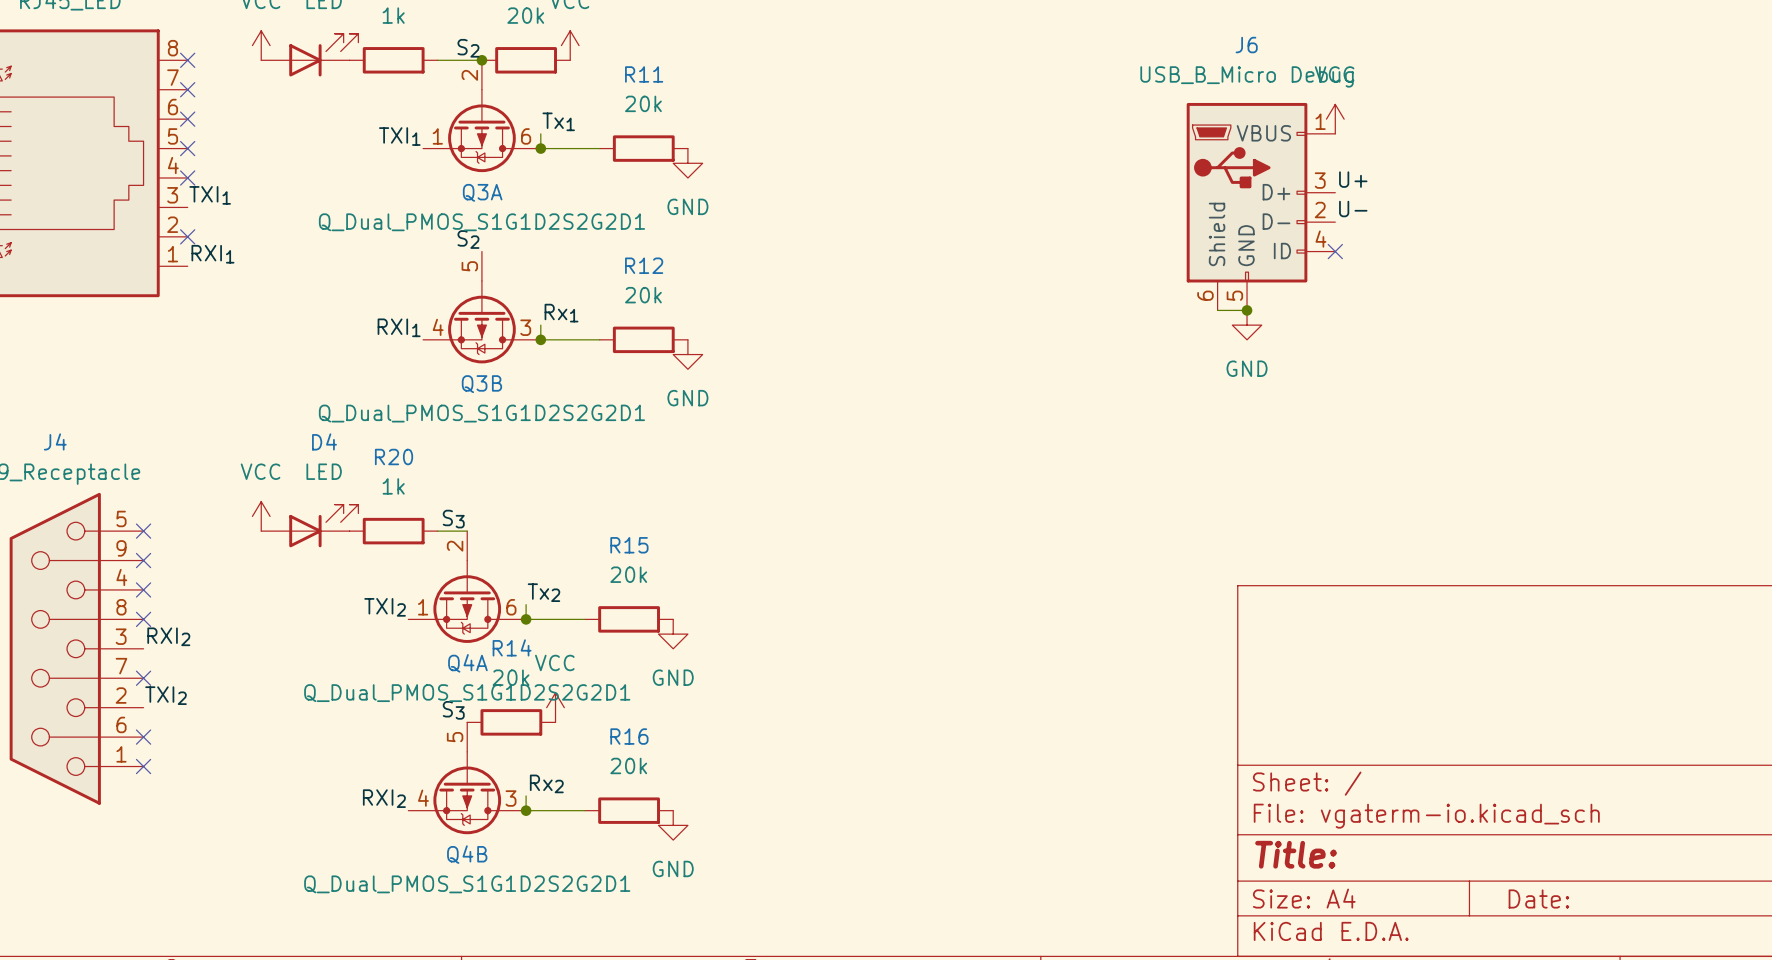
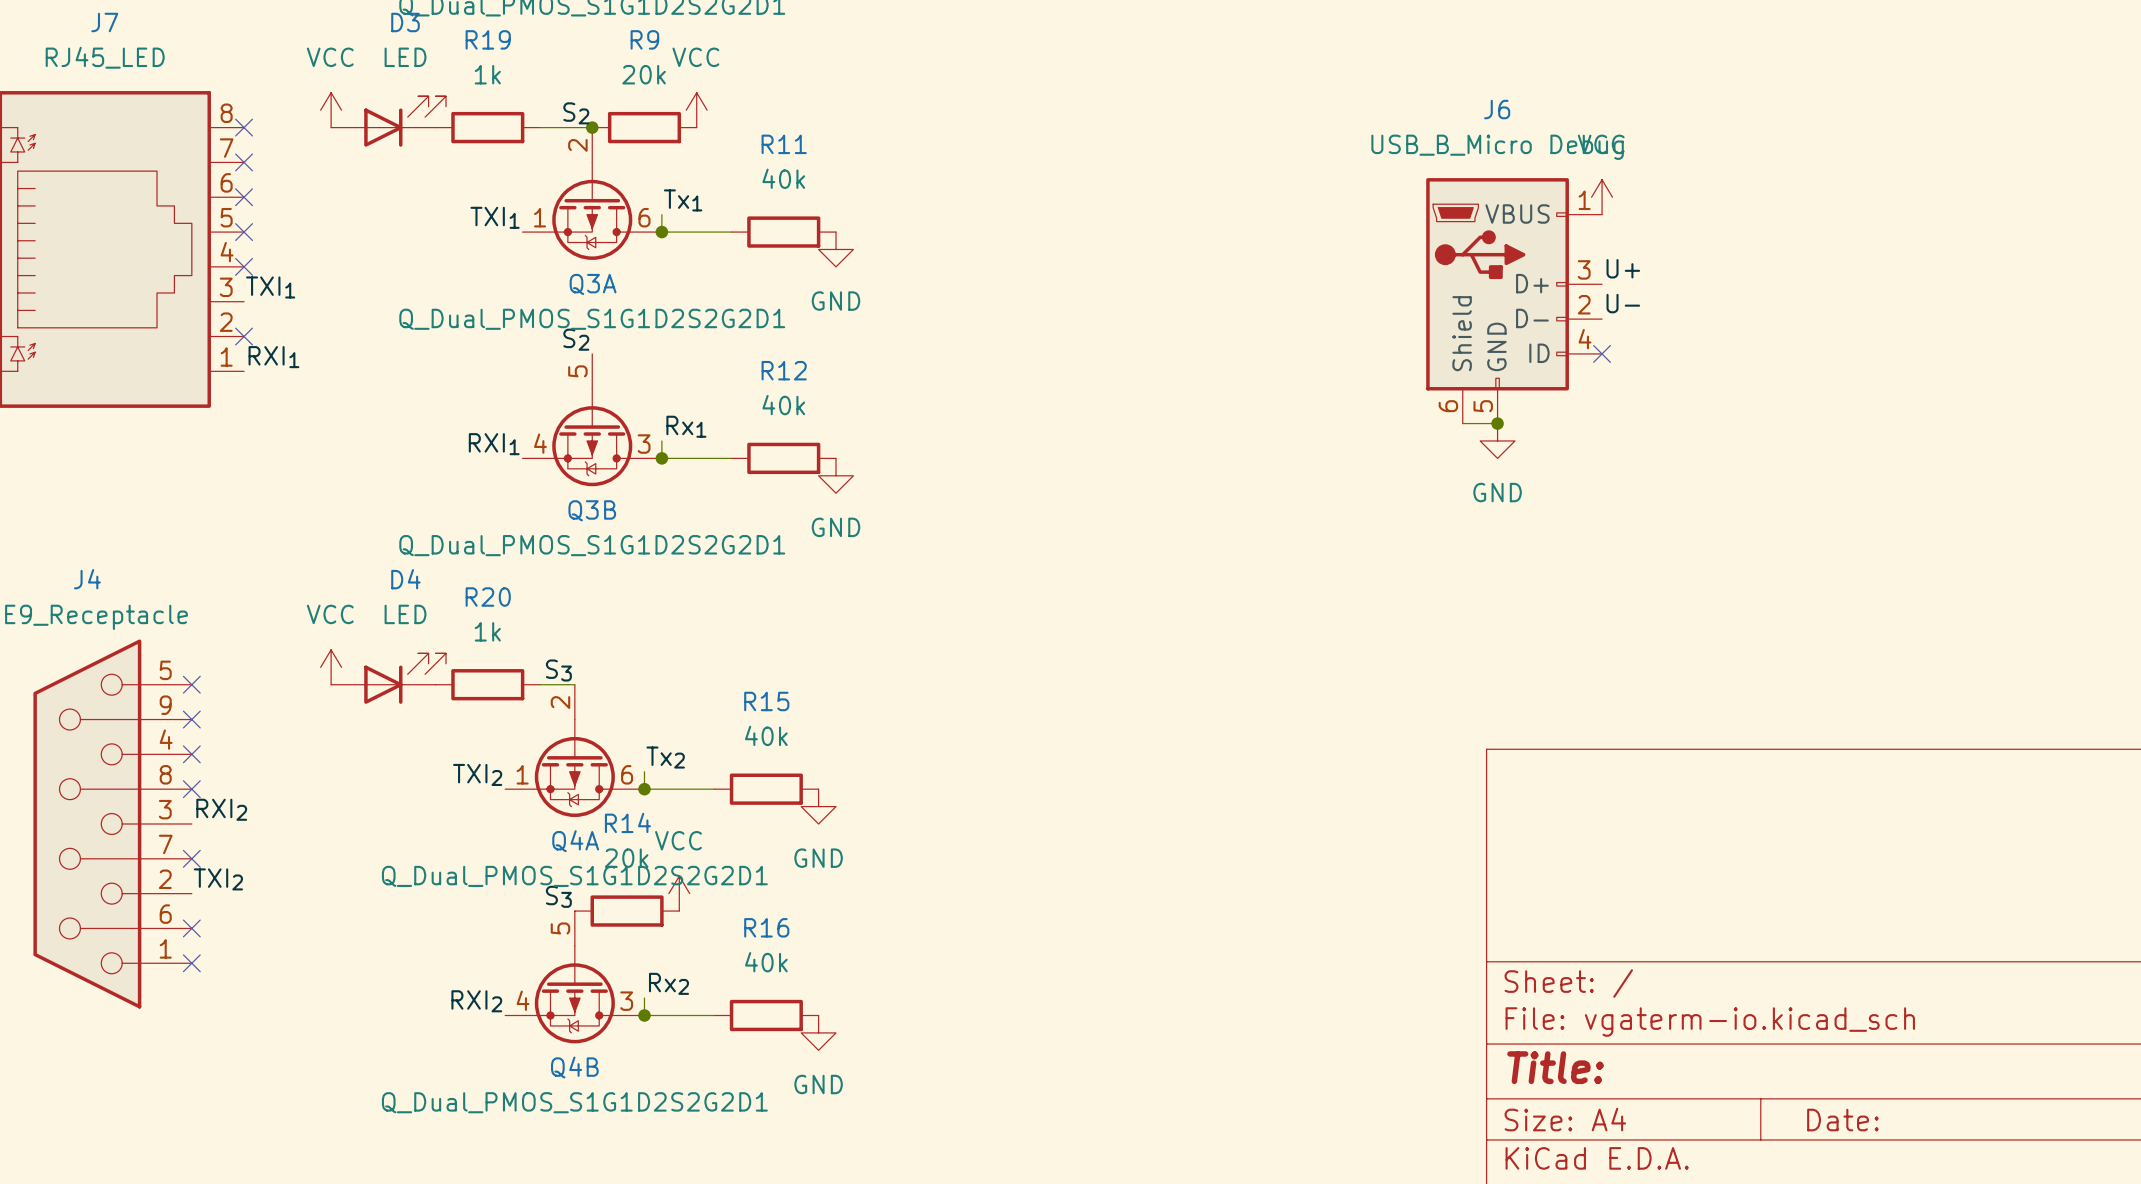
R11 value: 20k (643, 103) -> 40k (783, 178)
R12 value: 20k (643, 295) -> 40k (783, 405)
R15 value: 20k (628, 574) -> 40k (766, 735)
R16 value: 20k (628, 765) -> 40k (766, 962)

